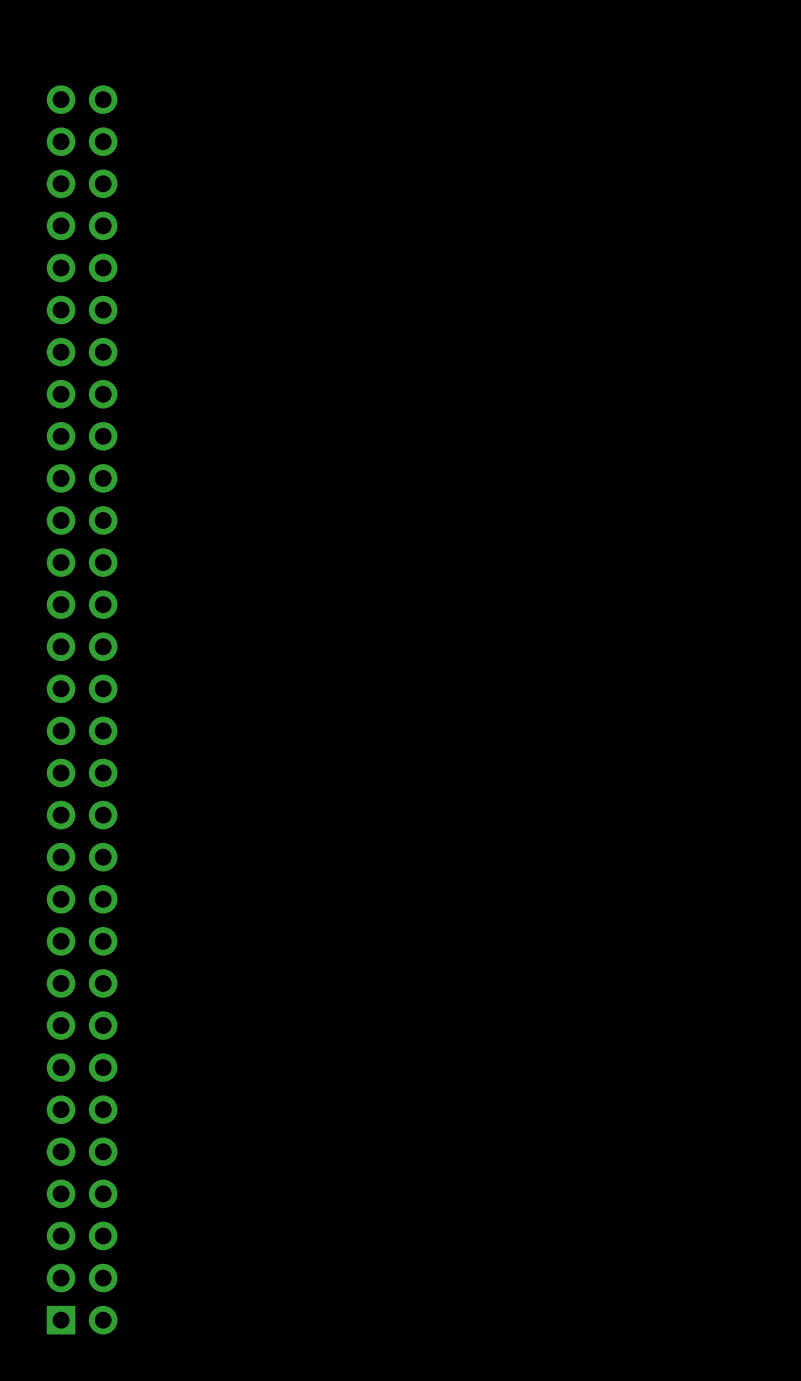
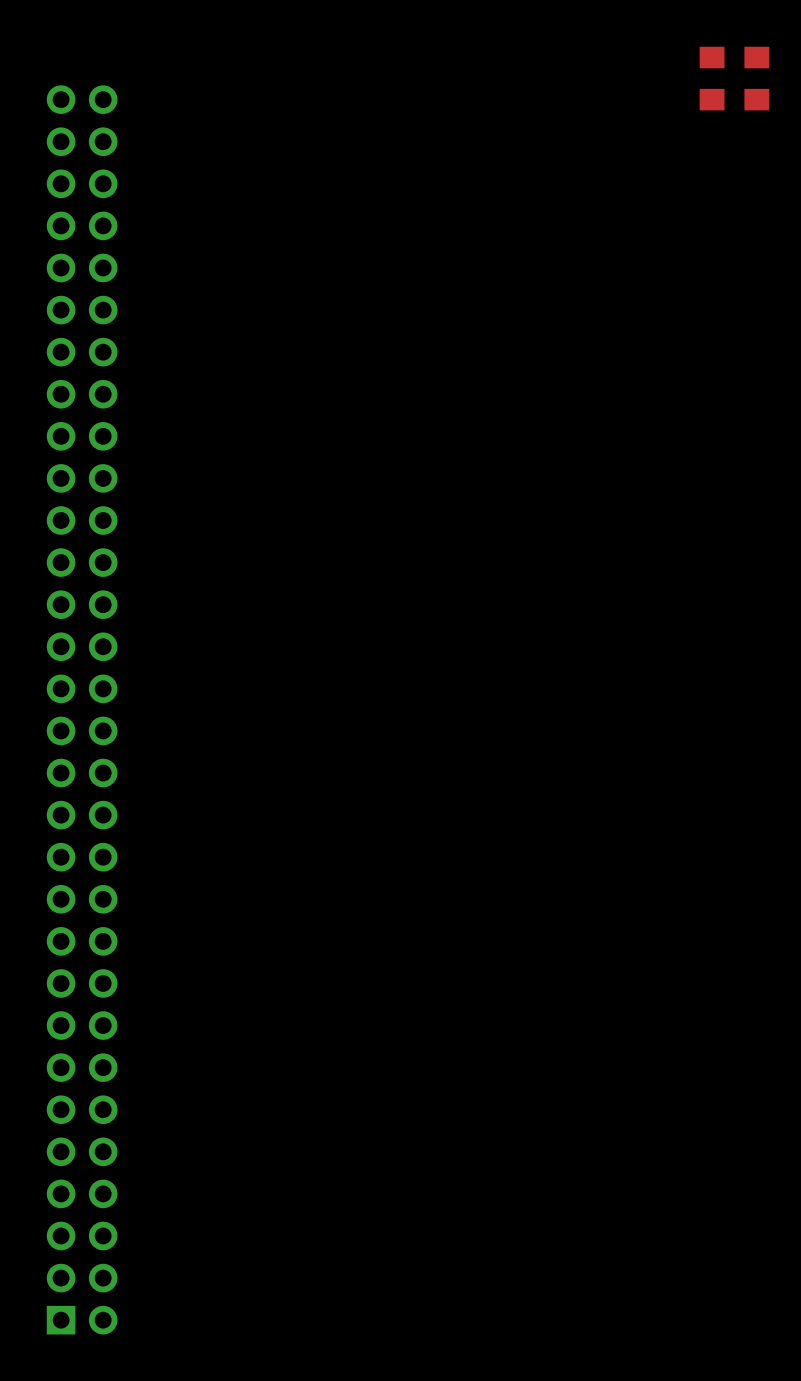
part: none -> (734, 57)
part: none -> (734, 99)

